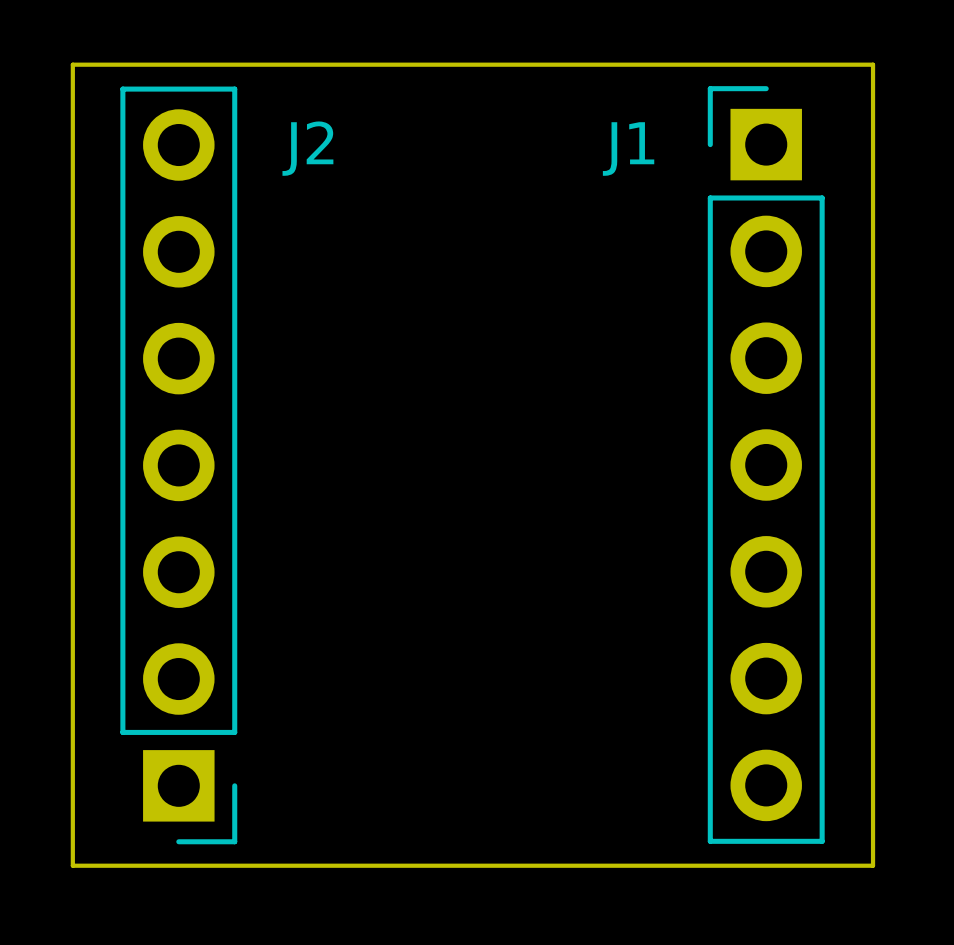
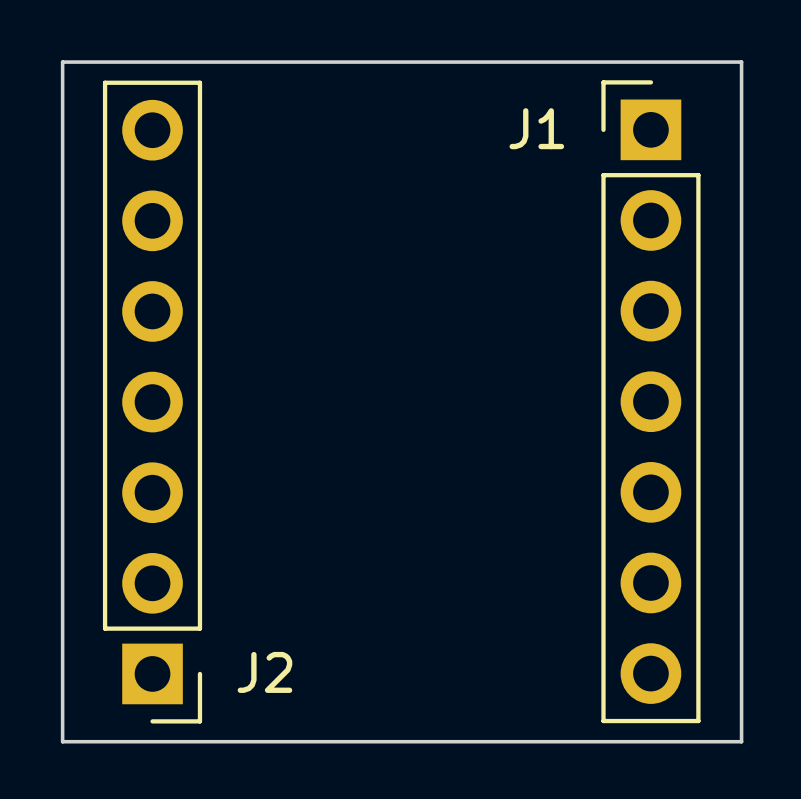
J2 name position: J2 (307, 148) -> J2 (264, 672)

